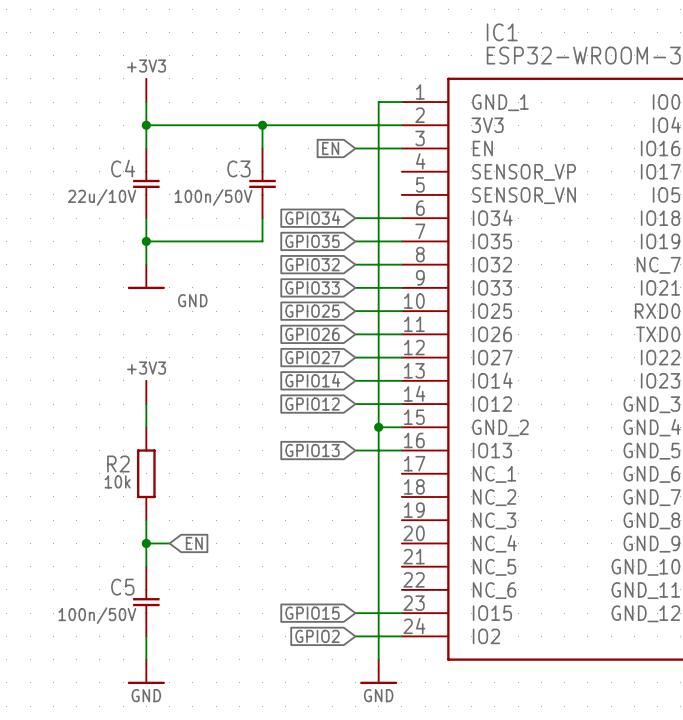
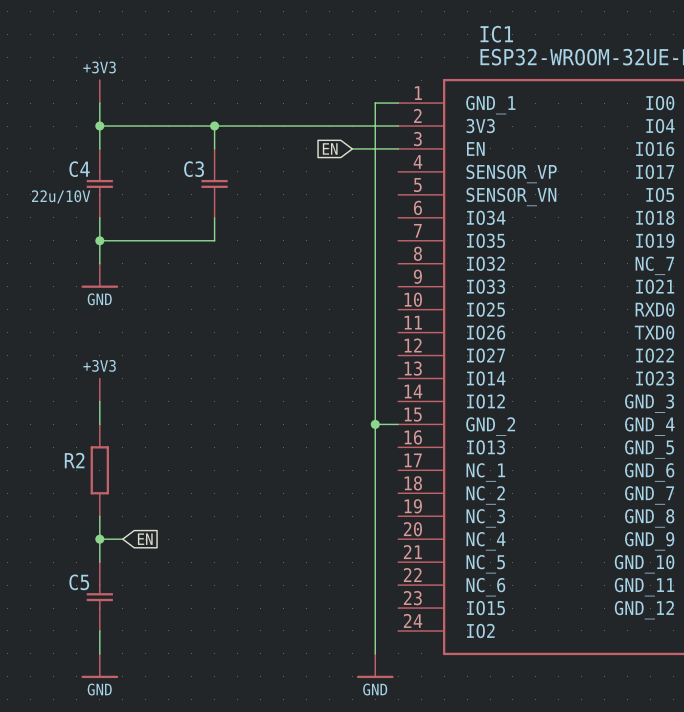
power symbol position: +3V3 (146, 90) -> +3V3 (99, 91)
wire: (146, 102) (146, 148) -> (99, 103) (99, 148)
wire: none -> (99, 126) (145, 126)
junction: none -> (99, 126)
junction: (146, 125) -> none
junction: none -> (214, 126)
wire: (262, 125) (262, 148) -> (214, 126) (214, 148)
junction: (262, 125) -> none
C4 position: (146, 183) -> (99, 183)
C3 position: (262, 183) -> (214, 183)
C3 value: 100n/50V (213, 197) -> none
global label: GPIO34 (312, 217) -> none
wire: (146, 218) (146, 264) -> (99, 217) (99, 263)
wire: (262, 218) (262, 241) (216, 241) -> (214, 217) (214, 240)
wire: (355, 218) (401, 218) -> none
wire: none -> (99, 240) (145, 240)
junction position: (146, 241) -> (99, 240)
global label: GPIO35 (312, 241) -> none
wire: (355, 241) (401, 241) -> none
global label: GPIO32 (312, 264) -> none
wire: (355, 264) (401, 264) -> none
power symbol position: GND (146, 276) -> GND (99, 275)
global label: GPIO33 (312, 287) -> none
wire: (355, 287) (401, 287) -> none
power symbol text position: GND (192, 300) -> GND (99, 299)
global label: GPIO25 (312, 311) -> none
wire: (355, 311) (401, 311) -> none
global label: GPIO26 (312, 334) -> none
wire: (355, 334) (401, 334) -> none
global label: GPIO27 (312, 357) -> none
wire: (355, 357) (401, 357) -> none
global label: GPIO14 (312, 380) -> none
wire: (355, 380) (401, 380) -> none
power symbol position: +3V3 (146, 392) -> +3V3 (99, 389)
wire: (146, 404) (146, 427) -> (99, 401) (99, 424)
global label: GPIO12 (312, 404) -> none
wire: (355, 404) (401, 404) -> none
global label: GPIO13 (312, 450) -> none
wire: (355, 450) (401, 450) -> none
R2 position: (146, 473) -> (99, 470)
R2 value: 10k (117, 481) -> none
wire: (146, 520) (146, 566) -> (99, 516) (99, 562)
wire: (146, 543) (169, 543) -> (99, 539) (122, 539)
junction position: (146, 543) -> (99, 539)
global label position: EN (194, 543) -> EN (145, 539)
C5 position: (146, 601) -> (99, 596)
global label: GPIO15 (312, 613) -> none
wire: (355, 613) (401, 613) -> none
C5 value: 100n/50V (97, 615) -> none
wire: (146, 636) (146, 659) -> (99, 630) (99, 653)
global label: GPIO2 (317, 636) -> none
wire: (355, 636) (401, 636) -> none
power symbol position: GND (146, 671) -> GND (99, 666)

